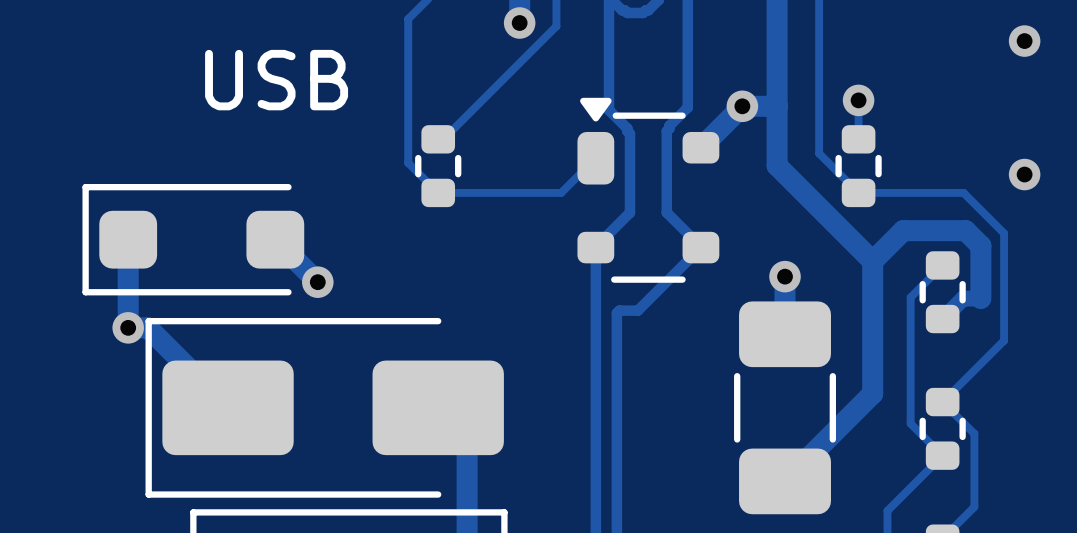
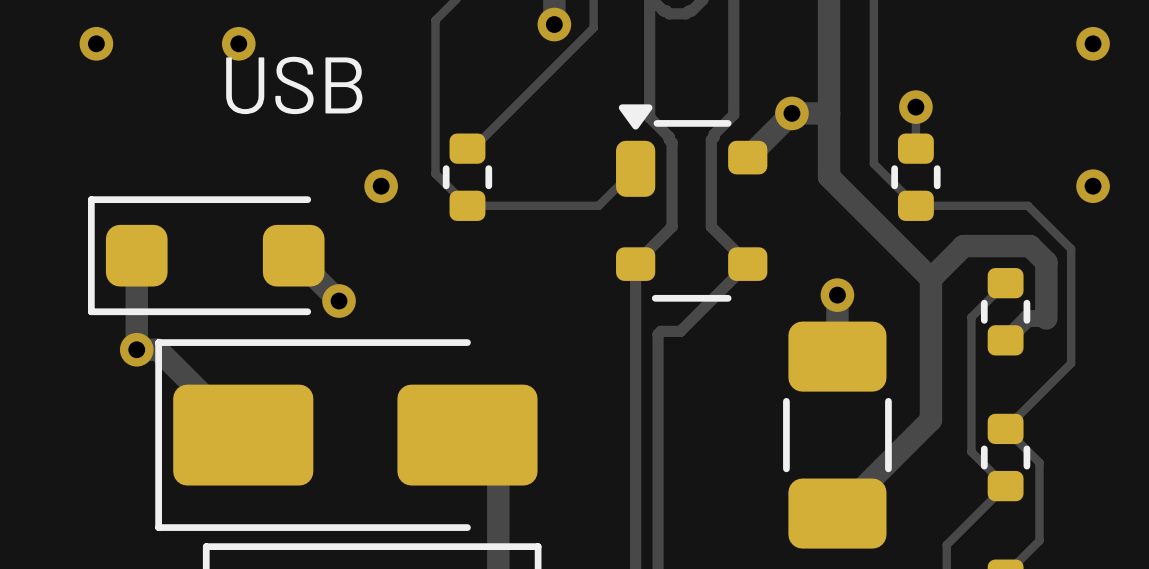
via: none -> (96, 43)
via: none -> (238, 43)
via: none -> (381, 186)

